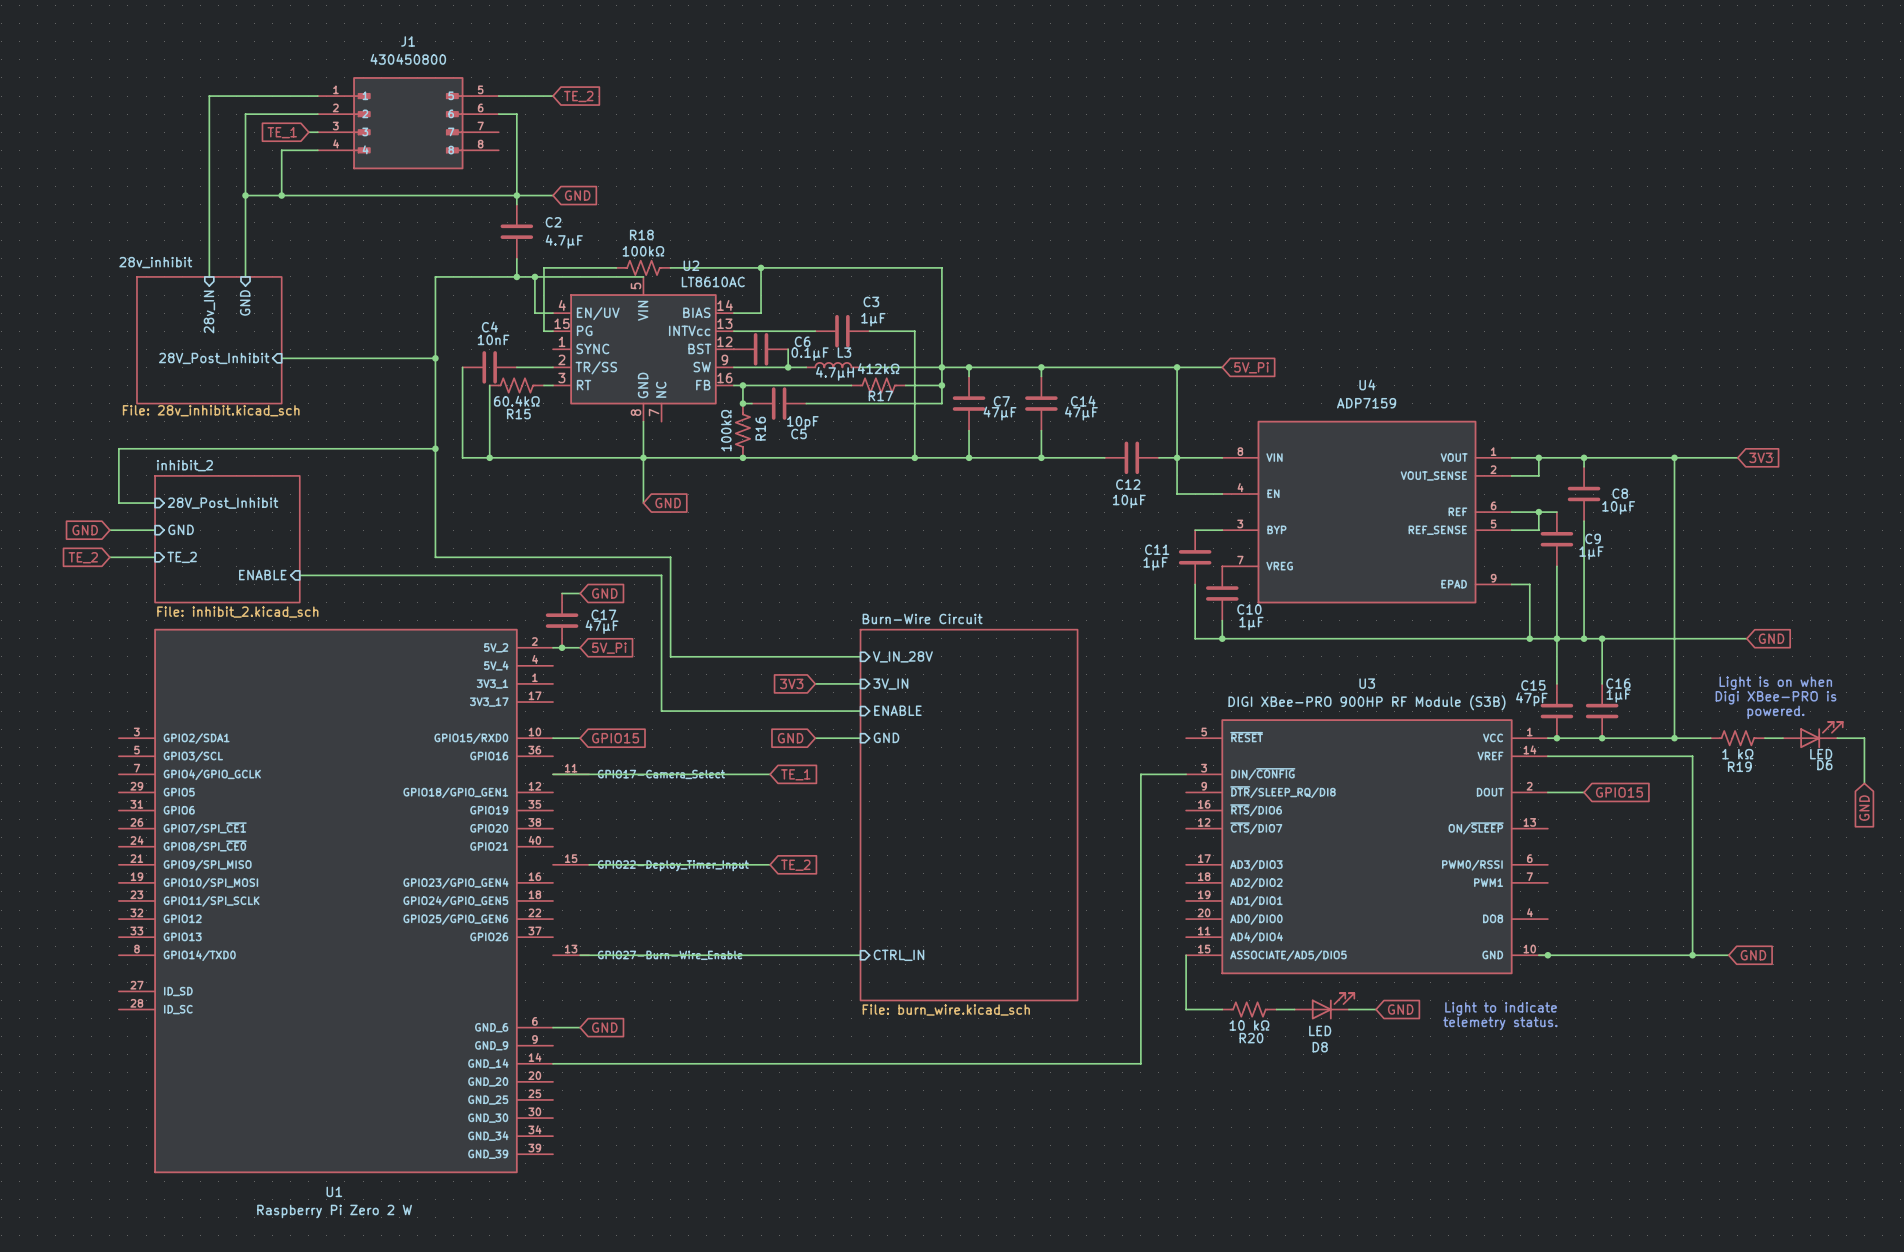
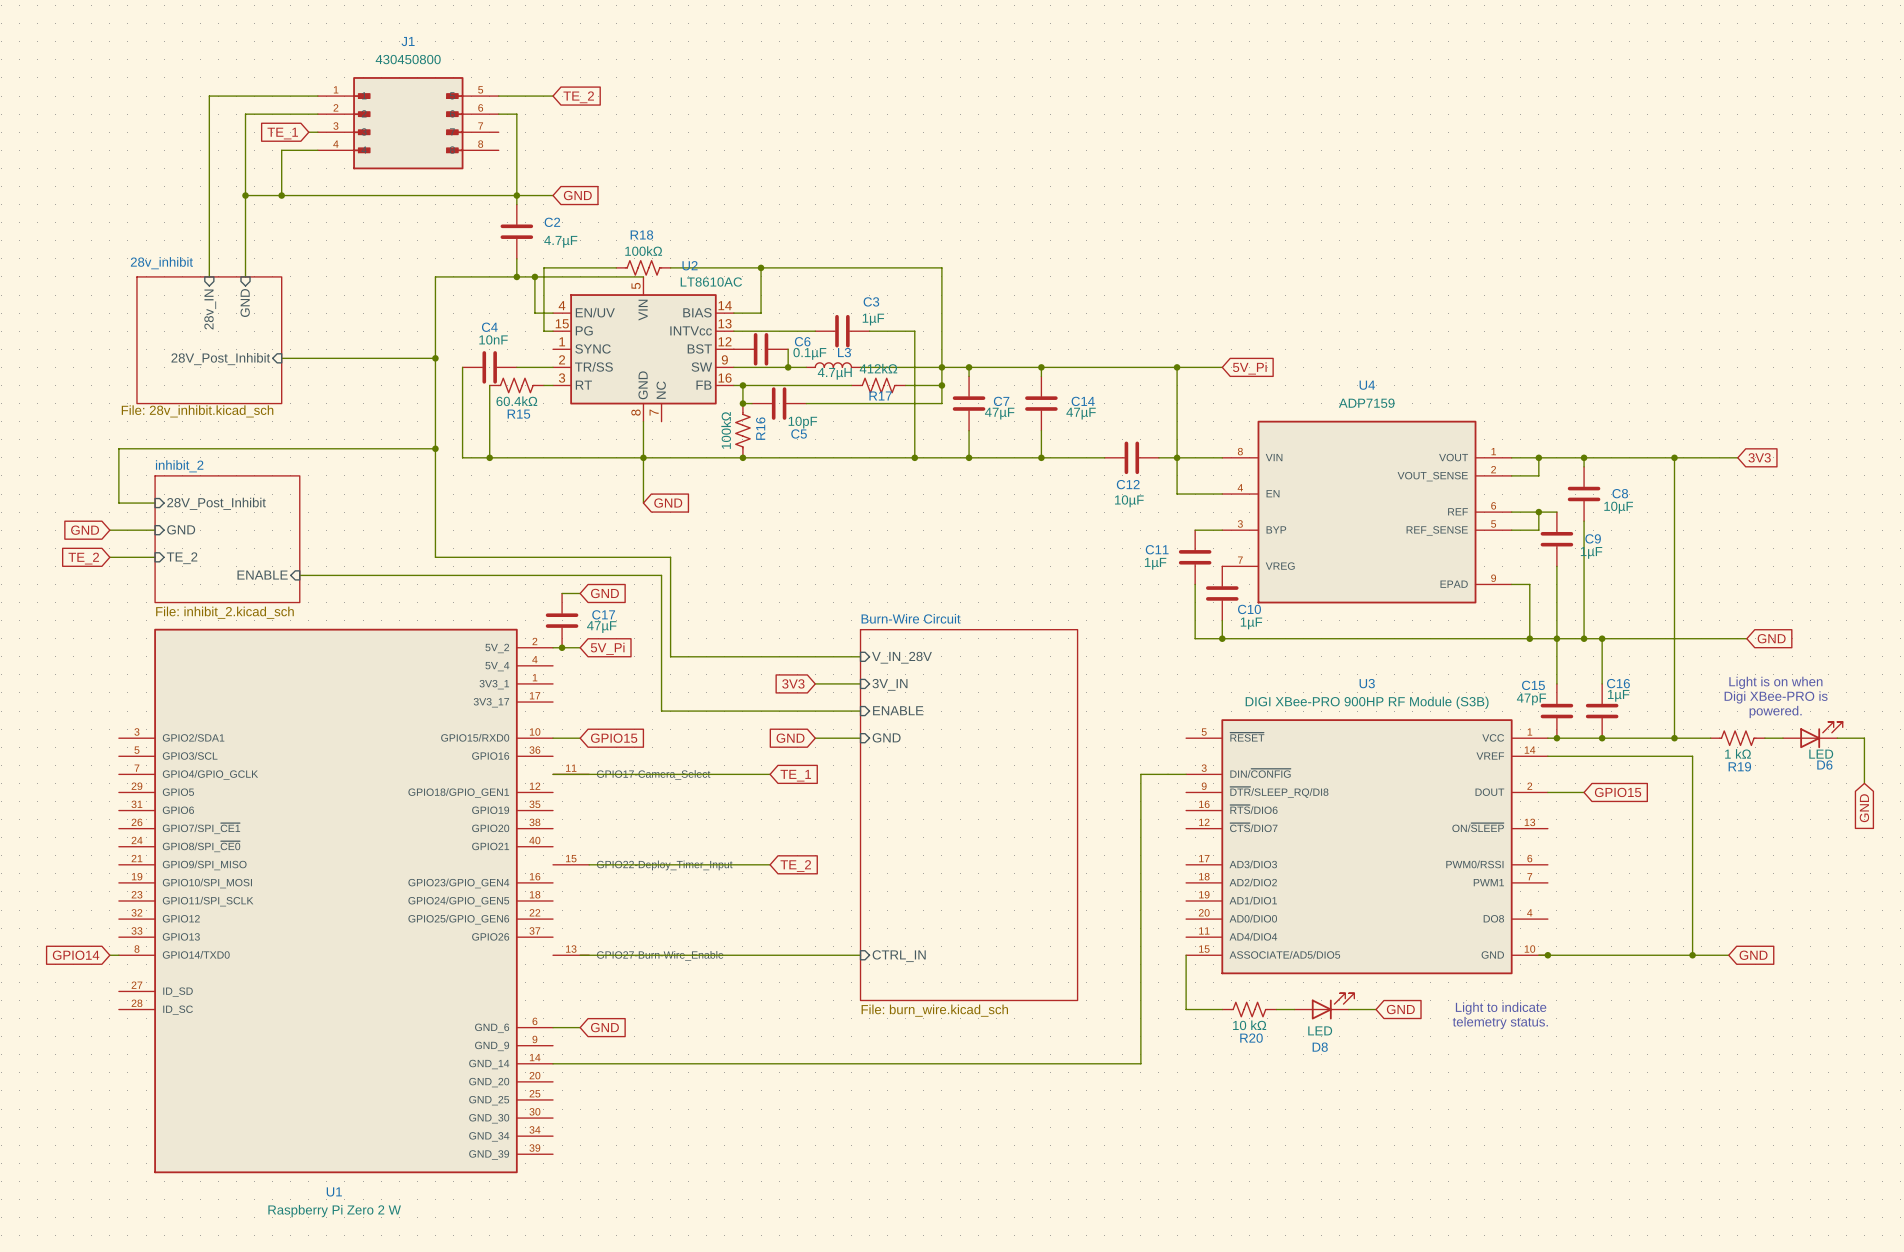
global label: none -> GPIO14 (76, 955)
wire: none -> (109, 955) (118, 955)

